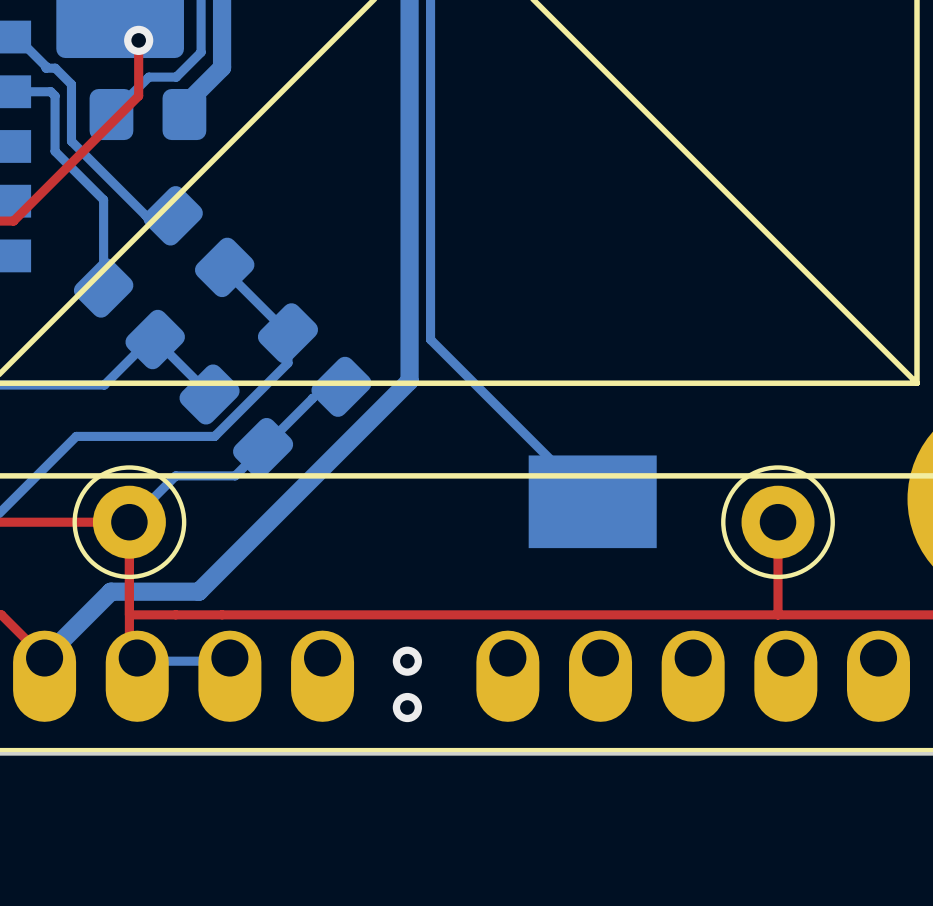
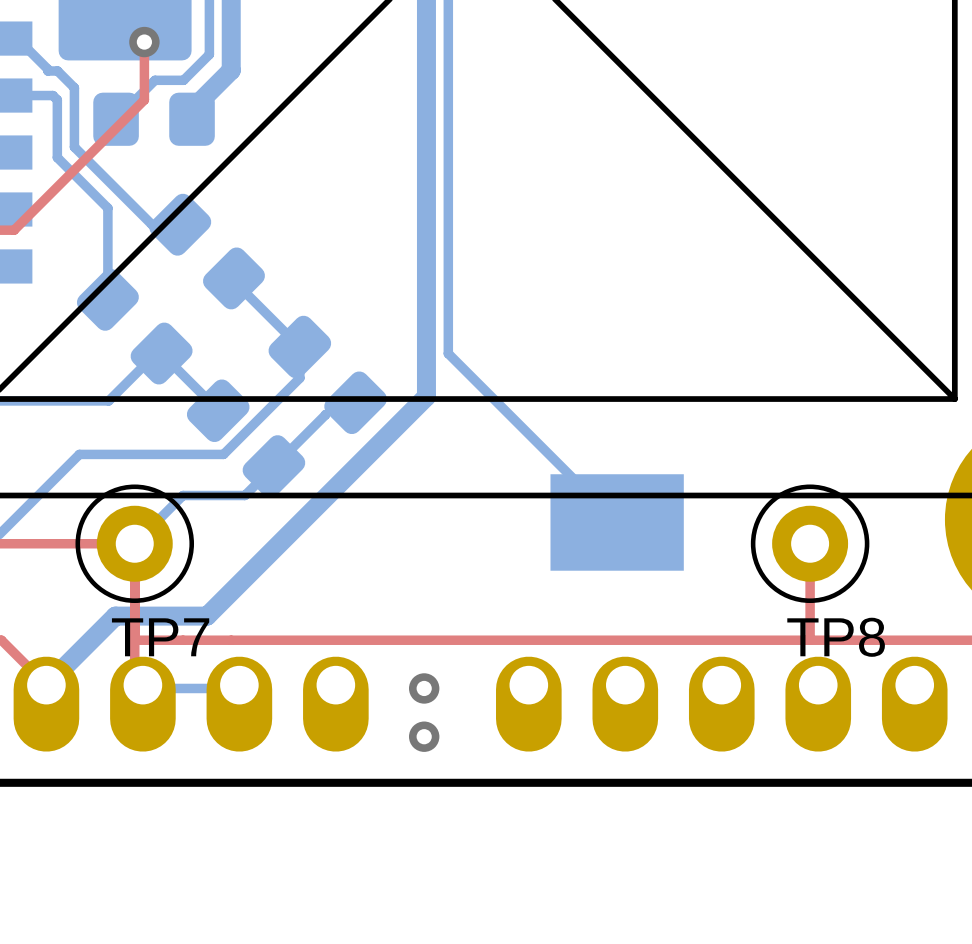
TP7 name: none -> TP7 (160, 637)
TP8 name: none -> TP8 (836, 637)

